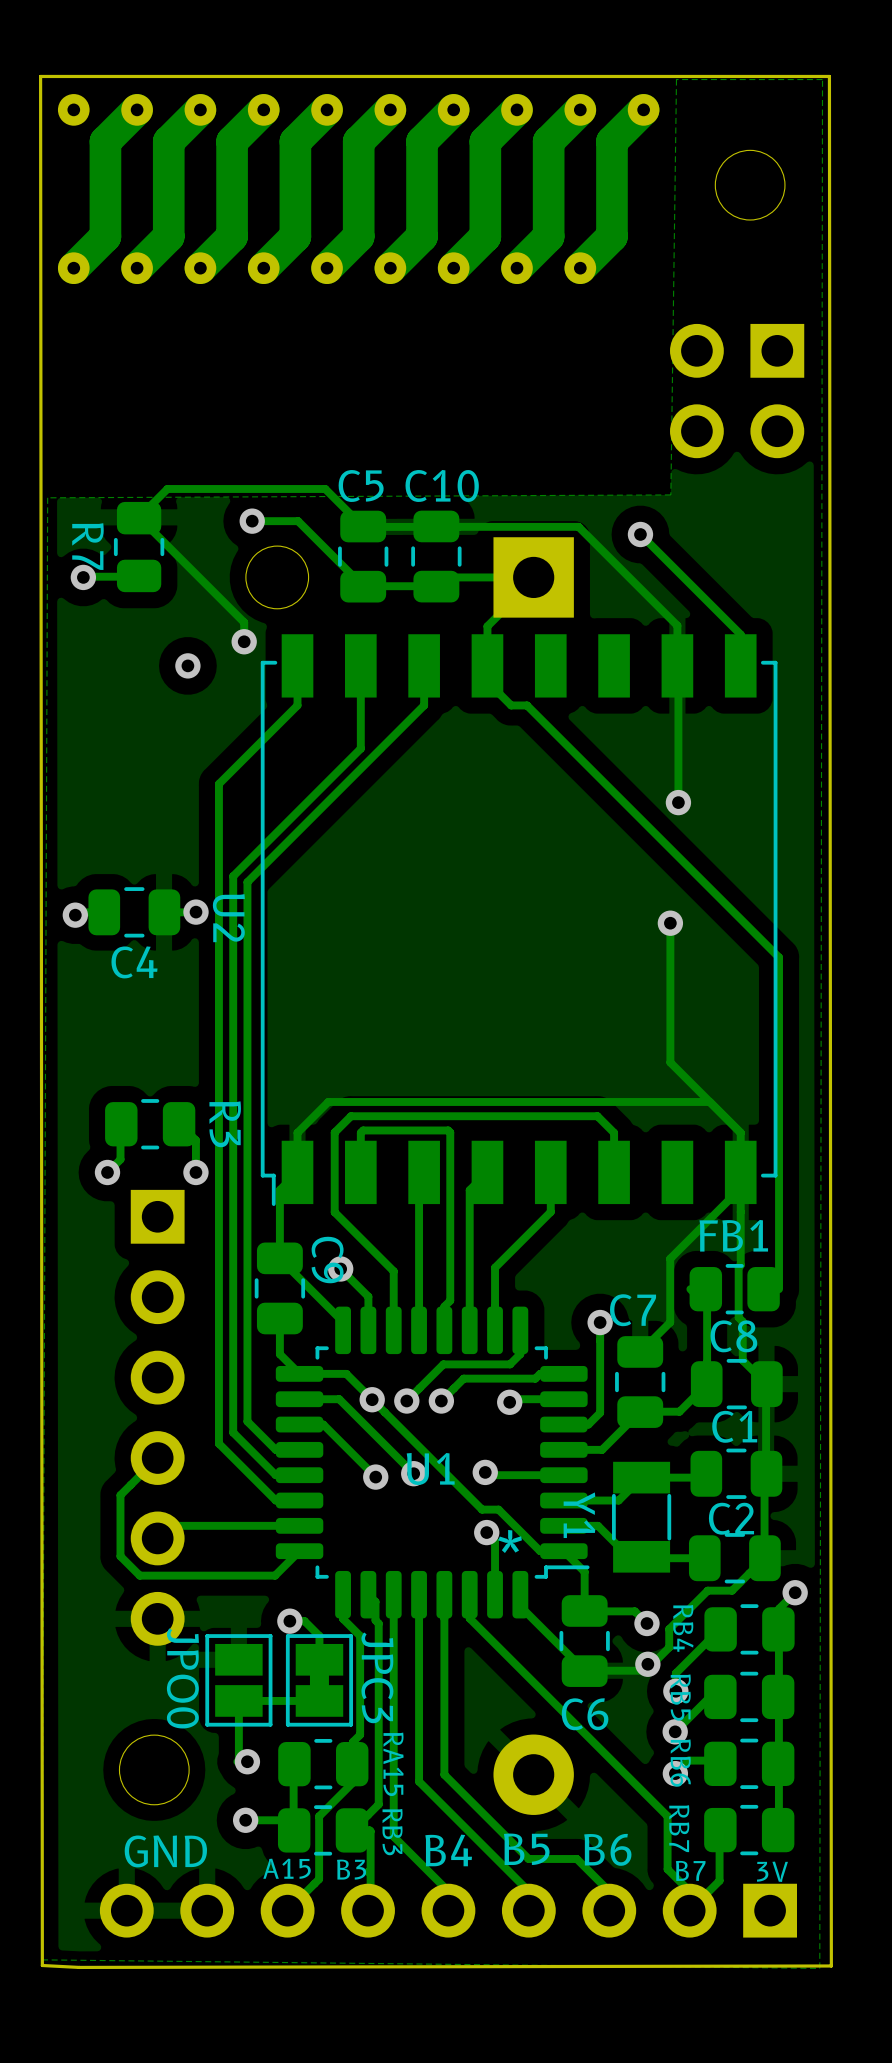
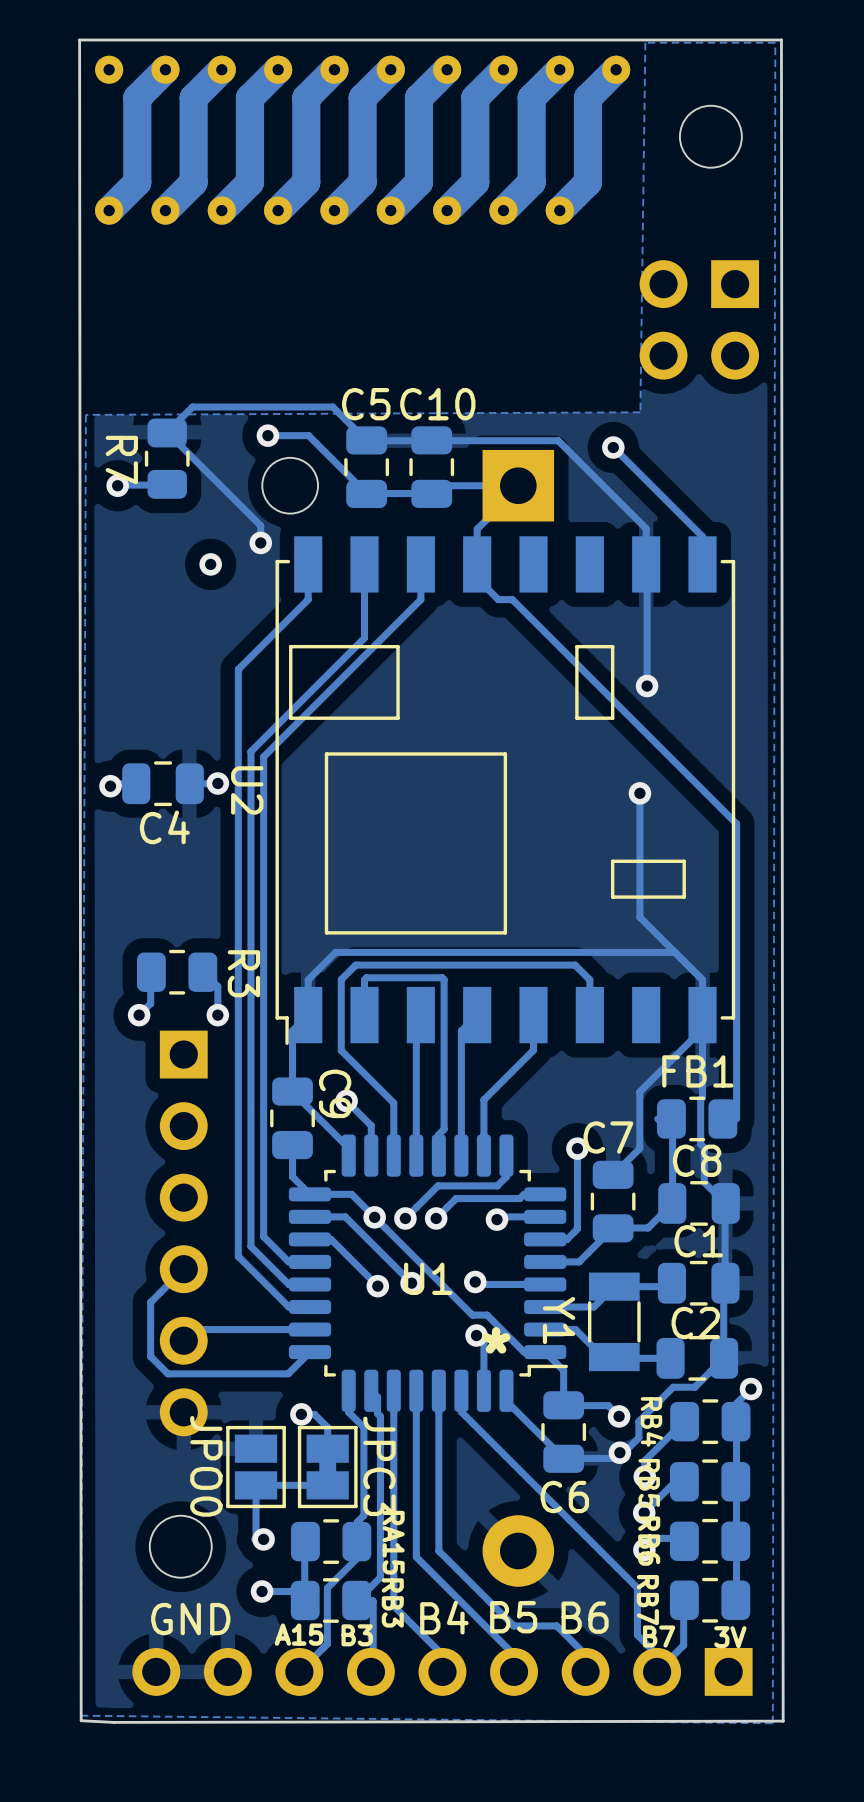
U2 footprint: [260, 634, 778, 1206] -> [275, 536, 736, 1045]

